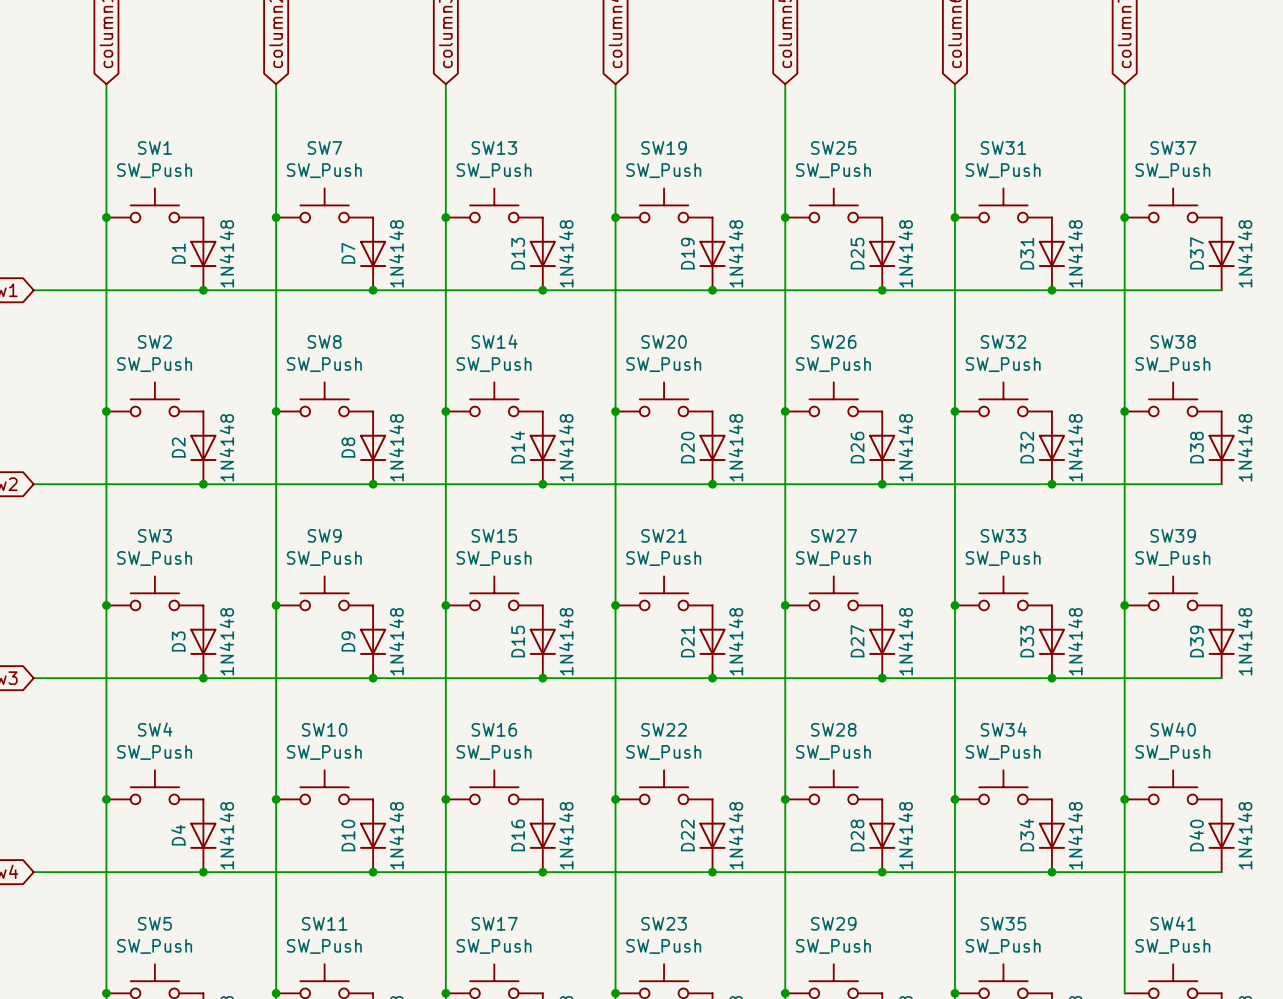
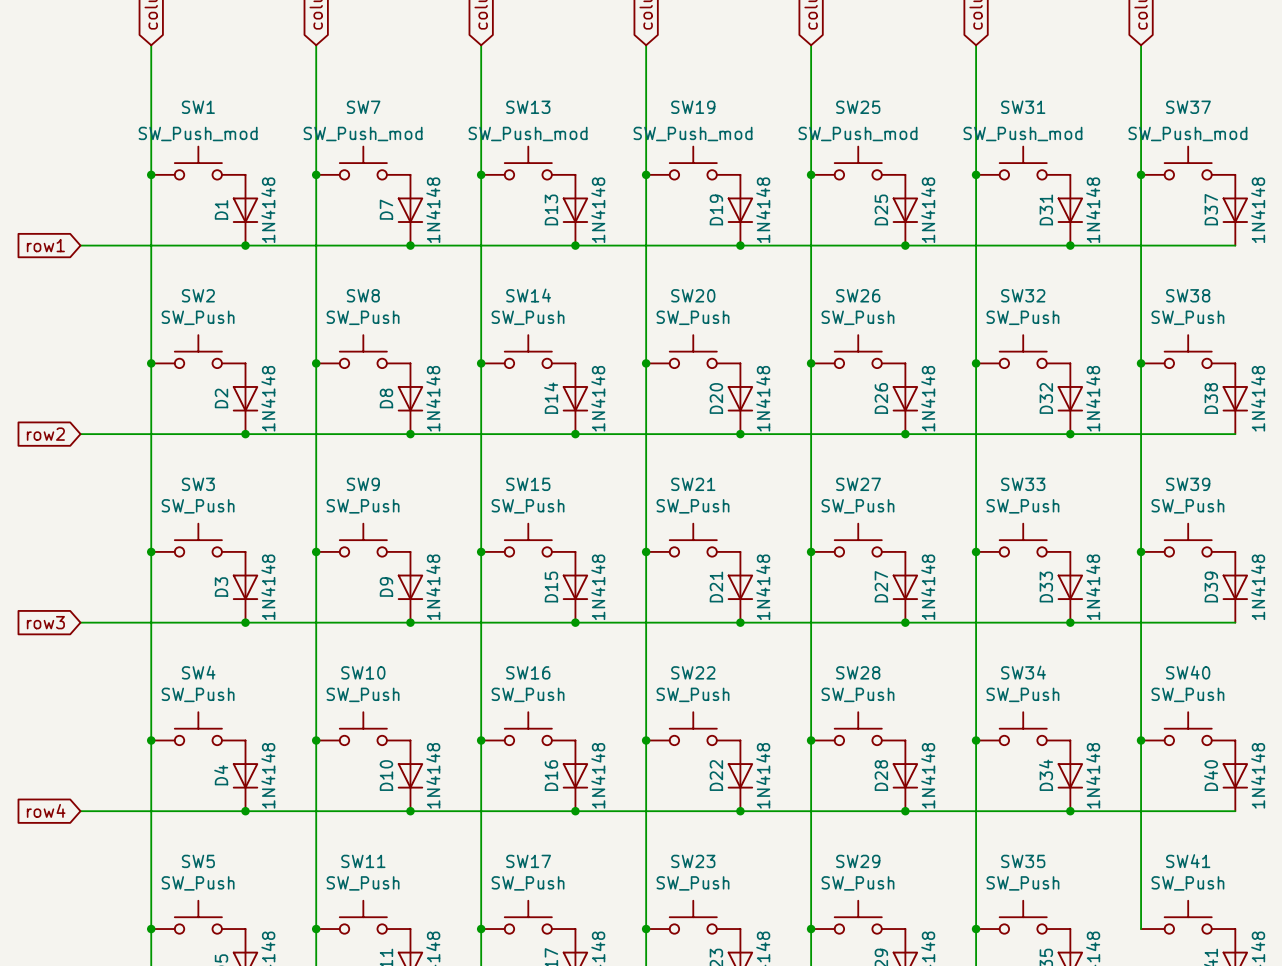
SW1 value: SW_Push (154, 170) -> SW_Push_mod (198, 133)
SW7 value: SW_Push (324, 170) -> SW_Push_mod (363, 133)
SW13 value: SW_Push (494, 170) -> SW_Push_mod (528, 133)
SW19 value: SW_Push (663, 170) -> SW_Push_mod (693, 133)
SW25 value: SW_Push (833, 170) -> SW_Push_mod (857, 133)
SW31 value: SW_Push (1003, 170) -> SW_Push_mod (1022, 133)
SW37 value: SW_Push (1172, 170) -> SW_Push_mod (1187, 133)

